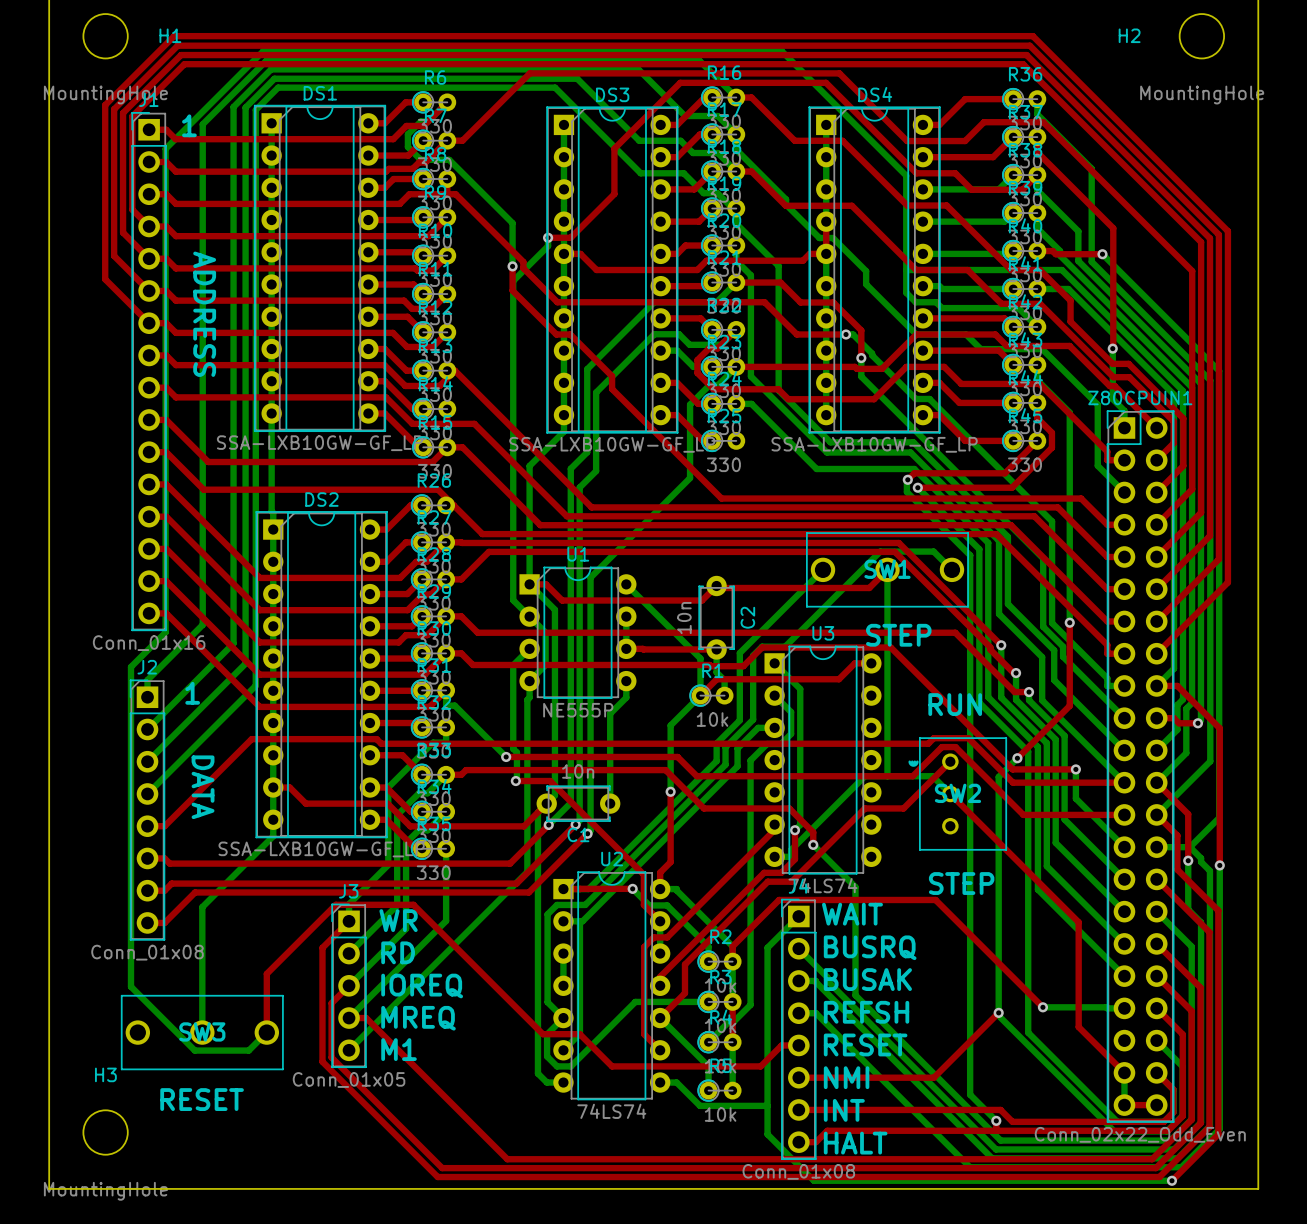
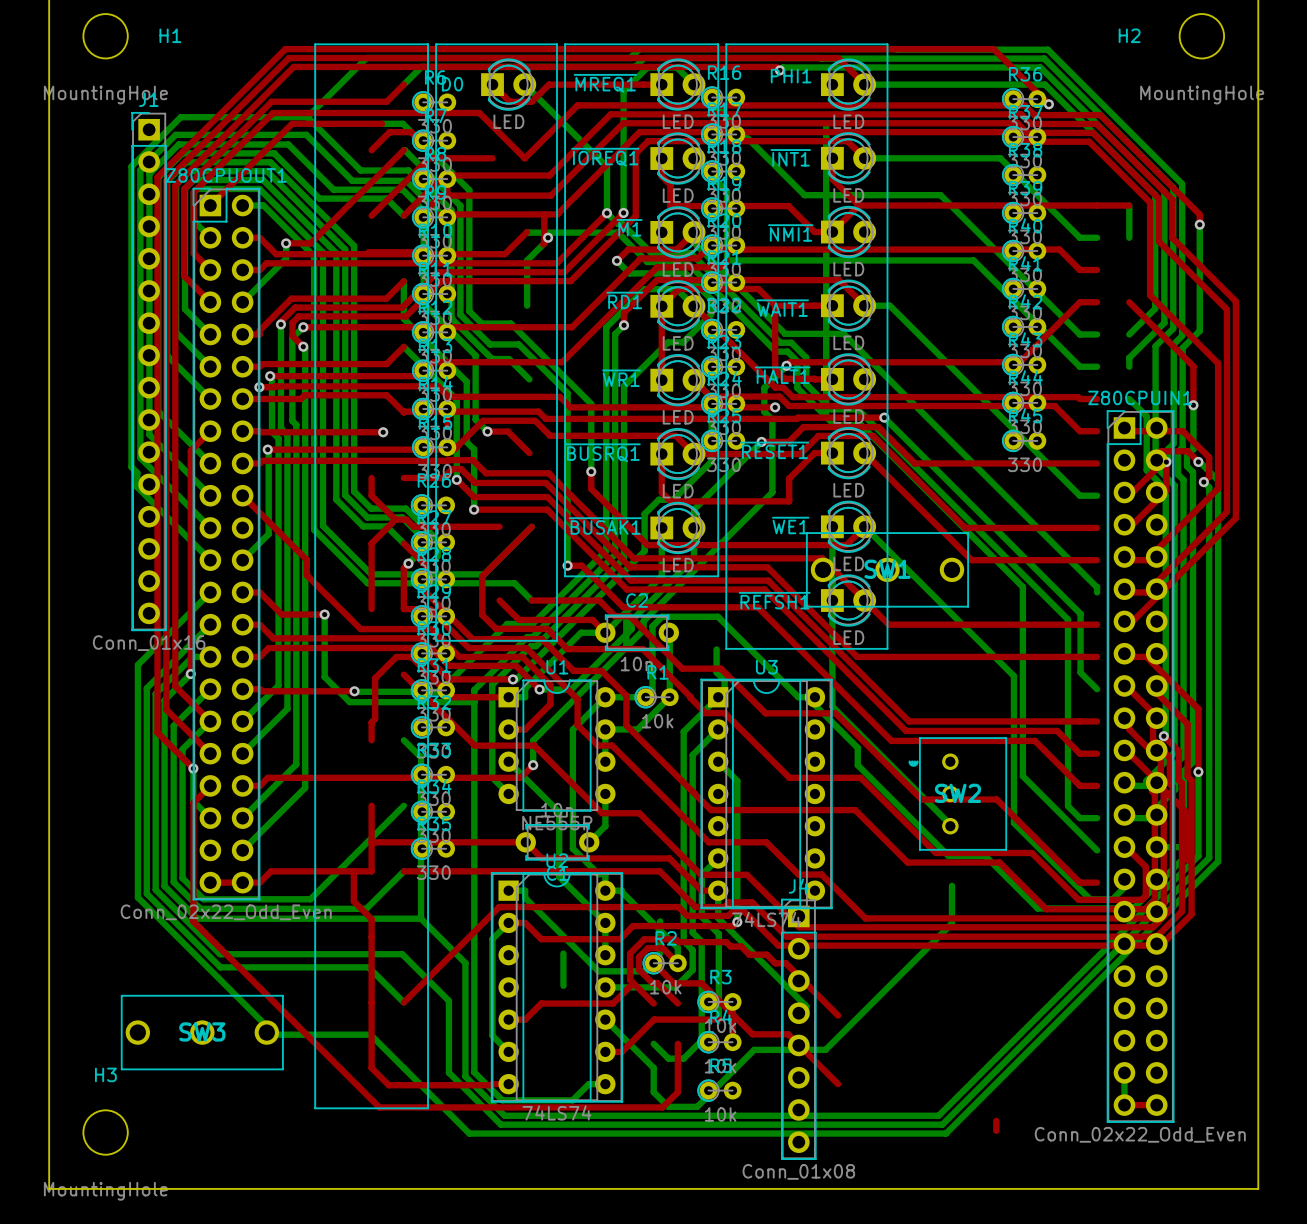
line: none -> (315, 44) (315, 1108) (428, 1108) (428, 44) (315, 44)
line: none -> (436, 44) (557, 44) (557, 640) (436, 640) (436, 44)
line: none -> (565, 44) (718, 44) (718, 576) (565, 576) (565, 44)
line: none -> (726, 44) (887, 44) (887, 648) (726, 648) (726, 44)
top track: none -> (779, 70) (776, 66) (293, 66) (175, 185) (175, 686) (210, 721)
bottom track: none -> (779, 70) (782, 67) (1040, 67) (1164, 191) (1164, 322) (1129, 357) (1129, 366)
via: none -> (779, 70)
top track: none -> (403, 84) (386, 101) (271, 101) (184, 189) (184, 276) (210, 302)
bottom track: none -> (403, 84) (421, 66) (635, 66) (644, 58) (1044, 58) (1173, 187) (1173, 328) (1155, 346) (1155, 466) (1174, 485) (1174, 752) (1146, 780) (1146, 785) (1129, 785)
top track: none -> (492, 84) (509, 101) (531, 101) (548, 84) (661, 84)
D0: none -> LED (508, 84)
bottom track: none -> (524, 84) (606, 166) (606, 213) (617, 223) (622, 223) (651, 253) (690, 253) (780, 342) (791, 342) (806, 357) (806, 384) (831, 409) (857, 409) (1067, 619) (1067, 806) (1079, 818) (1097, 818)
~{MREQ1}: none -> LED (677, 84)
PHI1: none -> LED (848, 84)
top track: none -> (864, 84) (838, 58) (289, 58) (166, 180) (166, 709) (210, 753)
bottom track: none -> (864, 84) (1045, 84) (1155, 194) (1155, 308) (1129, 334)
top track: (712, 97) (704, 97) (677, 124) (660, 124) -> none
top track: (736, 97) (751, 97) (794, 140) (842, 140) (907, 205) -> (858, 205) (907, 205)
bottom track: (736, 97) (699, 60) (266, 60) (202, 124) (202, 624) (147, 680) (147, 697) -> none
top track: (1013, 99) (965, 99) (939, 124) (922, 124) -> none
bottom track: (1037, 99) (1037, 114) (1091, 168) (1091, 261) (1210, 380) (1210, 761) (1156, 814) -> none
top track: (423, 102) (405, 102) (384, 123) (368, 123) -> none
top track: (447, 102) (423, 125) (406, 125) (393, 139) (175, 139) (166, 129) (149, 129) -> none
bottom track: (447, 102) (428, 121) (420, 121) (407, 134) (407, 147) (420, 159) (449, 159) (512, 223) (512, 266) -> none
top track: none -> (1048, 104) (993, 49) (285, 49) (157, 177) (157, 732) (193, 768)
via: none -> (1048, 104)
bottom track: none -> (307, 117) (360, 170) (408, 170) (451, 210) (451, 318) (492, 359) (508, 359) (529, 379)
bottom track: none -> (307, 117) (180, 117) (131, 166) (131, 466) (137, 472) (137, 487) (210, 560)
bottom track: none -> (307, 117) (366, 58) (630, 58) (639, 49) (1047, 49) (1182, 183) (1182, 335) (1173, 344) (1173, 443) (1168, 449) (1168, 460) (1166, 462)
bottom track: (271, 123) (273, 836) (202, 907) (202, 1032) -> none
top track: none -> (382, 123) (292, 123) (210, 205)
bottom track: none -> (382, 123) (402, 123) (469, 190) (469, 311) (481, 323) (510, 323) (591, 403) (591, 471)
bottom track: (563, 124) (563, 431) (529, 466) (529, 584) (554, 609) (554, 795) (537, 812) (537, 1073) (546, 1082) (563, 1082) -> none
text: 1 (189, 125) -> none
top track: (712, 134) (699, 134) (677, 157) (660, 157) -> none
top track: (1013, 137) (993, 157) (922, 157) -> none
top track: (1037, 137) (1037, 152) (1113, 228) (1112, 348) -> none
top track: (423, 140) (408, 155) (368, 155) -> none
top track: none -> (371, 150) (389, 132) (411, 132) (429, 150) (429, 158)
top track: none -> (403, 150) (310, 243) (286, 243)
bottom track: none -> (403, 150) (460, 205) (460, 314) (490, 344) (518, 344) (567, 393) (567, 565)
top track: none -> (429, 158) (371, 215)
top track: none -> (429, 158) (492, 158)
top track: none -> (661, 158) (661, 176) (670, 184) (670, 206) (788, 206) (814, 232) (832, 232) (858, 205)
~{IOREQ1}: none -> LED (677, 158)
bottom track: none -> (694, 158) (727, 191) (727, 260) (973, 260) (1079, 366) (1097, 366)
top track: none -> (832, 158) (832, 179) (858, 205)
~{INT1}: none -> LED (848, 158)
top track: none -> (864, 158) (847, 141) (648, 141) (635, 153) (635, 216) (570, 281) (441, 281) (406, 316) (298, 316) (292, 322) (292, 335) (303, 346)
bottom track: none -> (864, 158) (1000, 158) (1079, 237) (1097, 237)
top track: (149, 162) (166, 162) (175, 171) (386, 171) (388, 168) (412, 168) (419, 162) (425, 162) (447, 140) (462, 140) (529, 73) (839, 73) (907, 141) (965, 141) (983, 122) (1043, 122) (1192, 271) (1192, 489) (1156, 524) -> none
top track: (712, 171) (694, 189) (660, 189) -> none
top track: (736, 171) (751, 171) (785, 205) (851, 205) (916, 270) (967, 270) (1001, 303) (1040, 303) (1113, 377) (1129, 377) (1173, 421) (1173, 443) (1156, 460) -> none
bottom track: (736, 171) (717, 153) (692, 153) (680, 140) (639, 140) (577, 78) (274, 78) (245, 107) (245, 663) (147, 761) -> none
bottom track: (1013, 175) (998, 189) (922, 189) -> none
top track: (1037, 175) (1022, 189) (971, 189) (955, 173) (916, 173) (826, 82) (680, 82) (614, 148) (614, 194) (570, 237) (548, 237) -> none
bottom track: (1037, 175) (1037, 190) (1078, 231) (1078, 261) (1200, 383) (1200, 720) (1197, 723) -> none
top track: (423, 179) (393, 179) (384, 187) (368, 187) -> none
top track: (149, 194) (166, 194) (175, 203) (399, 203) (409, 194) (455, 194) (523, 261) (523, 268) (557, 302) (764, 302) (796, 334) (846, 334) -> none
bottom track: none -> (242, 205) (263, 205) (314, 256) (314, 529) (367, 583) (514, 583) (531, 600)
top track: (946, 205) (1011, 270) (1039, 270) (1070, 300) (1070, 321) (1112, 363) (1128, 363) (1183, 418) (1183, 465) (1156, 492) -> (946, 205) (1129, 205)
bottom track: none -> (1129, 205) (1129, 237)
top track: (712, 208) (699, 221) (660, 221) -> none
bottom track: (736, 208) (736, 223) (778, 266) (778, 390) (830, 442) (913, 442) (1007, 536) (1007, 604) (1054, 650) (1054, 680) (1124, 750) -> none
bottom track: (736, 211) (717, 193) (703, 193) (683, 173) (640, 173) (555, 87) (278, 87) (255, 110) (255, 685) (147, 793) -> none
top track: none -> (423, 212) (440, 195) (551, 195) (623, 123) (1017, 123) (1027, 132) (1092, 132) (1158, 198) (1158, 241) (1226, 309) (1226, 511) (1146, 592) (1129, 592)
top track: none -> (623, 212) (564, 272) (437, 272) (402, 307) (295, 307) (280, 321) (280, 324)
bottom track: none -> (623, 212) (623, 91) (647, 67) (676, 67) (804, 195) (940, 195) (1079, 334) (1097, 334)
via: none -> (623, 212)
top track: none -> (606, 213) (556, 263) (266, 263) (259, 270) (242, 270)
via: none -> (606, 213)
bottom track: (1013, 213) (1004, 221) (922, 221) -> none
bottom track: (1037, 213) (1037, 228) (1060, 251) (1060, 255) (1192, 387) (1192, 702) (1186, 708) (1186, 753) (1156, 782) -> none
top track: none -> (439, 214) (557, 214) (639, 132) (1013, 132) (1023, 141) (1089, 141) (1150, 202) (1150, 295) (1218, 363) (1218, 488) (1146, 560) (1129, 560)
bottom track: none -> (439, 214) (439, 212) (406, 180) (352, 180) (306, 134) (175, 134) (140, 170) (140, 457) (210, 527)
top track: none -> (544, 214) (543, 244)
top track: none -> (403, 215) (444, 175) (549, 175) (610, 114) (1021, 114) (1030, 123) (1096, 123) (1172, 199) (1172, 237) (1235, 301) (1235, 518) (1129, 624)
bottom track: none -> (403, 215) (386, 198) (319, 198) (274, 153) (182, 153) (158, 177) (158, 411) (210, 463)
top track: (423, 217) (420, 220) (368, 220) -> none
top track: (447, 217) (428, 236) (175, 236) (166, 226) (149, 226) (132, 209) (132, 116) (184, 64) (1023, 64) (1201, 242) (1201, 512) (1156, 556) -> none
top track: (826, 221) (826, 253) (809, 253) (802, 260) (706, 260) (697, 270) (596, 270) (580, 253) (563, 253) -> none
top track: none -> (1199, 224) (1199, 214) (1100, 115) (1034, 115) (1024, 105) (577, 105) (524, 158) (479, 113) (272, 113) (193, 192) (193, 253) (210, 270)
bottom track: none -> (1199, 224) (1199, 330) (1182, 347) (1182, 447) (1178, 451) (1178, 474) (1183, 480) (1183, 756) (1175, 764) (1175, 789) (1146, 818) (1129, 818)
via: none -> (1199, 224)
top track: none -> (527, 232) (504, 254) (276, 254) (259, 237) (242, 237)
bottom track: none -> (527, 232) (617, 232) (647, 262) (686, 262) (776, 351) (787, 351) (797, 361) (797, 387) (834, 425) (861, 425) (1022, 586) (1022, 776) (1097, 850)
~{M1}: none -> LED (677, 232)
top track: none -> (694, 232) (676, 249) (628, 249) (616, 260)
bottom track: none -> (694, 232) (694, 242) (785, 333) (843, 333) (1097, 587) (1097, 592)
~{NMI1}: none -> LED (848, 232)
bottom track: none -> (210, 237) (193, 221) (193, 192) (197, 188) (259, 188) (322, 252) (322, 526) (371, 574) (484, 574) (531, 526)
bottom track: (548, 237) (548, 246) (513, 281) (513, 600) (545, 632) (545, 665) (529, 681) (529, 697) (527, 699) (527, 871) (349, 1050) -> none
bottom track: none -> (286, 243) (286, 258) (242, 302)
via: none -> (286, 243)
bottom track: none -> (543, 244) (527, 260) (527, 305)
top track: (712, 245) (685, 245) (677, 253) (660, 253) -> none
bottom track: (736, 245) (736, 260) (750, 275) (750, 376) (827, 452) (910, 452) (999, 540) (999, 614) (1042, 657) (1042, 700) (1124, 782) -> none
bottom track: (1013, 251) (1010, 253) (922, 253) -> none
top track: (1037, 251) (1052, 251) (1055, 254) (1102, 254) -> none
bottom track: (1102, 254) (1219, 370) (1219, 817) (1189, 847) (1209, 870) (1209, 1126) (1177, 1158) (992, 1158) (815, 980) (798, 980) -> none
via: (1102, 254) -> none
top track: (447, 255) (432, 270) (417, 270) (415, 268) (175, 268) (166, 258) (149, 258) (123, 232) (123, 113) (181, 55) (1026, 55) (1210, 238) (1210, 535) (1156, 589) -> none
bottom track: none -> (616, 260) (629, 273) (685, 273) (711, 299) (711, 314) (683, 342) (668, 342) (624, 386) (624, 558) (536, 646) (530, 646) (492, 684) (492, 777) (508, 793)
via: none -> (616, 260)
top track: none -> (727, 260) (720, 267) (657, 267) (562, 362) (433, 362) (419, 376) (270, 376)
top track: (512, 266) (512, 290) (556, 334) (570, 334) (612, 376) (612, 389) (721, 498) (1081, 498) (1107, 524) (1124, 524) -> none
via: (512, 266) -> none
DS1: SSA-LXB10GW-GF_LP (320, 268) -> none
DS3: SSA-LXB10GW-GF_LP (612, 270) -> none
DS4: SSA-LXB10GW-GF_LP (874, 270) -> none
bottom track: (906, 270) (1061, 270) (1183, 391) (1183, 699) (1177, 705) (1177, 729) (1156, 750) -> none
top track: none -> (1097, 270) (1079, 270) (1059, 249) (706, 249) (697, 258) (640, 258) (572, 327) (303, 327)
top track: none -> (403, 281) (386, 298) (291, 298) (259, 330) (259, 334) (242, 334)
bottom track: none -> (403, 281) (403, 318) (466, 381) (466, 442) (474, 449) (474, 509)
top track: (712, 282) (708, 286) (660, 286) -> none
top track: (736, 282) (780, 282) (800, 302) (833, 302) (861, 330) (861, 358) -> none
bottom track: (736, 282) (716, 302) (654, 302) (587, 369) (587, 452) (570, 468) (570, 802) (548, 824) -> none
top track: (368, 284) (413, 284) (423, 294) -> none
bottom track: (922, 286) (939, 286) (942, 289) (1013, 289) -> none
bottom track: (1037, 289) (1068, 289) (1174, 394) (1174, 668) (1156, 685) -> none
top track: (447, 294) (432, 308) (412, 308) (404, 300) (175, 300) (166, 290) (149, 290) (114, 255) (114, 109) (177, 45) (1029, 45) (1218, 234) (1218, 559) (1156, 621) -> none
top track: none -> (1097, 302) (1079, 302) (1019, 362) (790, 362) (786, 365)
top track: none -> (1129, 302) (1193, 366) (1193, 405)
top track: none -> (775, 305) (775, 369) (784, 378) (832, 379)
top track: none -> (775, 305) (832, 305)
top track: none -> (775, 305) (758, 289) (679, 289) (661, 306) (661, 380)
~{WAIT1}: none -> LED (848, 305)
top track: none -> (864, 305) (839, 280) (656, 280) (624, 313) (624, 325)
bottom track: none -> (864, 305) (889, 305) (1079, 495) (1097, 495)
~{RD1}: none -> LED (677, 306)
top track: none -> (694, 306) (775, 387) (783, 387) (792, 397) (1078, 397) (1079, 398) (1097, 398)
bottom track: none -> (694, 306) (676, 289) (644, 289) (606, 327) (606, 550) (532, 623) (507, 623) (439, 691) (354, 691)
text: ADDRESS (204, 314) -> none
top track: (368, 316) (407, 316) (423, 332) -> none
top track: (660, 318) (700, 318) (712, 329) -> none
top track: (922, 318) (1004, 318) (1013, 326) -> none
bottom track: none -> (280, 324) (280, 428) (287, 434) (287, 708) (242, 753)
via: none -> (280, 324)
bottom track: none -> (624, 325) (615, 334) (615, 554) (532, 637) (527, 637) (474, 690) (474, 1072) (502, 1100) (572, 1100) (588, 1084) (605, 1084)
via: none -> (624, 325)
bottom track: (1037, 326) (1018, 308) (941, 308) (936, 302) (915, 302) (906, 292) (906, 175) (781, 51) (263, 51) (165, 148) (165, 632) (131, 666) (131, 986) (194, 1050) (248, 1050) (266, 1032) -> none
bottom track: none -> (303, 327) (292, 338) (292, 420) (296, 424) (296, 764) (242, 818)
via: none -> (303, 327)
top track: (736, 329) (717, 348) (709, 348) (697, 360) (697, 373) (713, 389) (778, 389) (788, 399) (874, 399) (906, 366) (944, 366) (961, 383) (1039, 383) (1107, 451) (1107, 460) (1124, 460) -> none
bottom track: (736, 329) (721, 344) (689, 344) (679, 334) (654, 334) (596, 392) (596, 471) (579, 487) (579, 820) (575, 824) -> none
top track: (447, 332) (432, 346) (407, 346) (392, 332) (175, 332) (166, 323) (149, 323) (105, 279) (105, 105) (174, 36) (1032, 36) (1227, 231) (1227, 582) (1156, 653) -> none
bottom track: none -> (210, 334) (184, 309) (184, 188) (193, 180) (263, 180) (336, 253) (336, 499) (363, 526) (386, 526) (403, 543)
bottom track: (846, 334) (853, 334) (915, 398) (929, 398) (1052, 521) (1052, 623) (1107, 678) (1107, 685) (1124, 685) -> none
via: (846, 334) -> none
bottom track: none -> (303, 346) (305, 348) (305, 787) (242, 850)
via: none -> (303, 346)
top track: none -> (403, 346) (386, 364) (262, 364) (259, 366) (242, 366)
bottom track: none -> (403, 346) (456, 399) (456, 479)
bottom track: (1112, 348) (1112, 399) (1124, 410) (1124, 428) -> none
via: (1112, 348) -> none
top track: (368, 349) (384, 349) (406, 370) (423, 370) -> none
bottom track: (660, 350) (677, 350) (693, 366) (712, 366) -> none
top track: (922, 350) (998, 350) (1013, 364) -> none
top track: (149, 355) (166, 355) (175, 365) (384, 365) (405, 385) (439, 385) (454, 370) -> none
bottom track: (861, 358) (861, 376) (1043, 558) (1043, 626) (1063, 646) (1063, 656) (1124, 718) -> none
via: (861, 358) -> none
bottom track: (1037, 364) (1037, 380) (1069, 412) (1069, 622) -> none
bottom track: none -> (786, 365) (764, 387) (764, 411) (772, 419) (772, 492) (643, 621) (643, 630) (533, 740) (533, 765)
via: none -> (786, 365)
bottom track: none -> (210, 366) (176, 332) (176, 184) (189, 171) (266, 171) (345, 249) (345, 495) (367, 517) (402, 517) (421, 536) (421, 550) (408, 563)
top track: (736, 366) (854, 366) (856, 368) (881, 368) (916, 334) (995, 334) (1006, 345) (1069, 345) (1109, 386) (1114, 386) (1156, 428) -> none
bottom track: (736, 366) (717, 385) (709, 385) (690, 404) (690, 478) (590, 577) (590, 830) (587, 833) -> none
top track: (454, 370) (591, 507) (1057, 507) (1107, 556) (1124, 556) -> none
bottom track: none -> (270, 376) (272, 378) (272, 431) (278, 438) (278, 685) (242, 721)
via: none -> (270, 376)
~{HALT1}: none -> LED (848, 379)
~{WR1}: none -> LED (677, 380)
top track: none -> (694, 380) (710, 396) (779, 396) (789, 406) (1054, 406) (1079, 431) (1097, 431)
bottom track: none -> (694, 380) (711, 397) (711, 461) (673, 499) (658, 499) (644, 513) (644, 551) (516, 679) (512, 679)
top track: (368, 381) (384, 381) (412, 409) (423, 409) -> none
top track: (660, 382) (677, 382) (698, 403) (712, 403) -> none
top track: (922, 382) (939, 382) (959, 402) (1013, 402) -> none
top track: (149, 387) (166, 387) (175, 397) (386, 397) (412, 423) (474, 423) (566, 516) (1034, 516) (1107, 589) (1124, 589) -> none
top track: none -> (259, 387) (437, 386) (448, 396) (559, 396) (570, 407) (775, 407)
via: none -> (259, 387)
bottom track: none -> (210, 398) (167, 355) (167, 181) (186, 162) (270, 162) (354, 245) (354, 491) (371, 508) (405, 508) (437, 540) (437, 556)
top track: none -> (242, 398) (300, 398) (304, 395) (386, 395) (403, 412) (538, 411) (545, 418) (884, 417)
bottom track: none -> (1129, 398) (1146, 416) (1146, 470) (1165, 489) (1165, 734) (1163, 736)
top track: (1037, 402) (1037, 418) (1051, 432) (1051, 447) (1011, 487) (917, 487) -> none
bottom track: (736, 403) (751, 403) (816, 468) (914, 468) (988, 542) (988, 697) (1037, 746) (1037, 889) (1124, 976) -> none
bottom track: none -> (1193, 405) (1193, 449) (1186, 455) (1186, 466) (1193, 472) (1193, 762) (1184, 770) (1184, 857) (1133, 908) (1037, 908) (985, 856) (948, 856) (857, 765) (857, 747) (814, 705) (814, 697) (798, 697) (717, 616) (662, 616) (652, 626) (652, 690) (645, 697) (605, 697) (572, 729) (572, 848) (598, 874) (605, 874) (605, 890) (621, 890) (677, 948) (677, 963)
via: none -> (1193, 405)
via: none -> (775, 407)
top track: (368, 413) (384, 413) (418, 447) (423, 447) -> none
top track: (660, 415) (677, 415) (703, 440) (712, 440) -> none
top track: (922, 415) (939, 415) (965, 440) (1013, 440) -> none
bottom track: none -> (884, 417) (1080, 613) (1080, 672) (1097, 689)
via: none -> (884, 417)
top track: (149, 419) (166, 419) (208, 462) (432, 462) (447, 447) (462, 447) (540, 525) (1011, 525) (1107, 621) (1124, 621) -> none
top track: none -> (210, 431) (190, 450) (190, 674)
top track: none -> (242, 431) (383, 432)
top track: none -> (487, 431) (507, 431) (529, 453)
bottom track: none -> (487, 431) (475, 419) (475, 355) (423, 303) (423, 210) (402, 189) (333, 189) (288, 144) (178, 144) (149, 173) (149, 434) (210, 495)
via: none -> (487, 431)
top track: none -> (1129, 431) (1182, 431) (1209, 457) (1209, 476) (1203, 482)
via: none -> (383, 432)
top track: (1037, 440) (1004, 473) (914, 473) (907, 479) -> none
top track: none -> (761, 441) (788, 441) (803, 427) (878, 427) (914, 463) (1097, 463)
bottom track: none -> (761, 441) (694, 509) (694, 558) (631, 620) (631, 629) (571, 689) (539, 689)
via: none -> (761, 441)
top track: none -> (267, 449) (454, 449) (483, 420) (535, 420) (550, 435) (675, 435) (694, 454) (800, 454) (818, 435) (873, 435) (965, 527) (1097, 527)
bottom track: none -> (267, 449) (268, 534) (242, 560)
via: none -> (267, 449)
top track: (149, 452) (166, 452) (203, 489) (438, 489) (482, 534) (996, 534) (1107, 645) (1107, 653) (1124, 653) -> none
top track: none -> (832, 453) (814, 453) (789, 478) (789, 501) (670, 501) (661, 492) (661, 454)
~{RESET1}: none -> LED (848, 453)
top track: none -> (864, 453) (971, 560) (1097, 560)
~{BUSRQ1}: none -> LED (677, 454)
top track: none -> (1198, 461) (1187, 451) (1160, 451) (1155, 456) (1155, 469) (1129, 495)
bottom track: none -> (1198, 461) (1218, 480) (1218, 861) (946, 1133) (469, 1133) (370, 1034) (275, 1034) (137, 897) (137, 664) (210, 592)
via: none -> (1198, 461)
top track: none -> (1166, 462) (1166, 490) (1129, 527)
via: none -> (1166, 462)
top track: none -> (242, 463) (259, 463) (262, 460) (472, 460) (486, 473) (548, 473) (633, 558) (822, 558) (888, 624) (1097, 624)
top track: none -> (591, 471) (591, 488) (647, 545) (846, 545) (864, 526)
via: none -> (591, 471)
top track: none -> (371, 477) (371, 495) (395, 519)
top track: none -> (403, 477) (443, 477) (452, 469) (461, 469) (475, 482) (545, 482) (630, 567) (767, 567) (857, 656) (1097, 656)
top track: none -> (456, 479) (474, 497) (547, 497) (630, 580) (768, 580) (909, 721) (1097, 721)
via: none -> (456, 479)
bottom track: (907, 479) (906, 492) (970, 555) (970, 1094) (996, 1120) -> none
via: (907, 479) -> none
bottom track: none -> (1203, 482) (1209, 487) (1209, 857) (942, 1124) (500, 1124) (448, 1072) (448, 1000) (402, 954) (220, 954) (155, 889) (155, 693) (192, 656) (210, 656)
via: none -> (1203, 482)
top track: (149, 484) (166, 484) (259, 577) (400, 577) (416, 561) (426, 561) (446, 542) (898, 542) (1001, 645) -> none
bottom track: (917, 487) (979, 549) (979, 702) (1028, 751) (1028, 1032) (1117, 1121) (1163, 1121) (1173, 1112) (1173, 1089) (1156, 1072) -> none
via: (917, 487) -> none
bottom track: (1124, 492) (1097, 465) (1097, 404) (1042, 349) (980, 349) (966, 334) (916, 334) (866, 284) (866, 271) (832, 238) (819, 238) (786, 204) (786, 199) (736, 149) (736, 134) (717, 116) (685, 116) (638, 69) (271, 69) (233, 107) (233, 643) (147, 729) -> none
top track: none -> (242, 495) (306, 559) (306, 575) (360, 629) (431, 629) (459, 656) (522, 656) (550, 685) (550, 704) (525, 729) (508, 729)
top track: (422, 505) (410, 505) (386, 529) (369, 529) -> none
top track: none -> (474, 509) (547, 509) (627, 589) (764, 589) (906, 730) (1057, 730) (1079, 753) (1097, 753)
via: none -> (474, 509)
top track: (149, 516) (166, 516) (259, 610) (407, 610) (423, 594) (431, 594) (446, 579) (461, 579) (488, 551) (894, 551) (1013, 673) (1016, 673) -> none
top track: none -> (395, 519) (406, 519) (413, 526) (499, 526)
top track: none -> (395, 519) (371, 543) (371, 609)
top track: none -> (531, 526) (482, 576) (482, 615) (496, 628) (547, 628) (567, 649) (642, 649) (705, 713) (724, 713) (789, 777) (860, 777) (935, 852) (1031, 852) (1078, 899) (1141, 899) (1145, 895) (1145, 866) (1129, 850)
bottom track: none -> (832, 526) (832, 706) (951, 826)
~{WE1}: none -> LED (848, 526)
bottom track: none -> (864, 526) (1013, 676) (1013, 823) (1090, 899) (1112, 899) (1129, 882)
bottom track: none -> (661, 527) (661, 576) (605, 632) (580, 632) (525, 688) (525, 697) (508, 697)
~{BUSAK1}: none -> LED (677, 527)
top track: (422, 542) (405, 542) (386, 561) (369, 561) -> none
top track: none -> (403, 543) (426, 566) (426, 593) (472, 639) (541, 639) (573, 670) (601, 670) (626, 695) (626, 725) (711, 810) (855, 810) (907, 862) (999, 862) (1046, 909) (1145, 909) (1154, 899) (1154, 793) (1152, 791) (1152, 776) (1129, 753)
Z80CPUOUT1: none -> Conn_02x22_Odd_Even (226, 544)
top track: (149, 548) (166, 548) (259, 642) (398, 642) (406, 635) (427, 635) (446, 616) (461, 616) (477, 632) (955, 632) (1014, 692) (1029, 692) -> none
top track: none -> (408, 563) (403, 568) (403, 609) (429, 609) (468, 648) (526, 648) (577, 699) (577, 725) (597, 745) (612, 745) (708, 842) (766, 842) (798, 874) (821, 874) (865, 918) (1149, 918) (1163, 904) (1163, 790) (1160, 787) (1160, 761) (1129, 729) (1129, 721)
via: none -> (408, 563)
top track: none -> (567, 565) (581, 565) (623, 607) (757, 607) (891, 740) (1034, 740) (1079, 785) (1097, 785)
via: none -> (567, 565)
bottom track: (823, 569) (739, 653) (739, 720) (716, 743) (716, 761) (588, 889) (563, 889) -> none
top track: (887, 569) (869, 587) (718, 587) (716, 585) (702, 600) (599, 600) -> (1097, 882) (1079, 882) (996, 799) (921, 799) (835, 713) (765, 713) (720, 668) (682, 668) (629, 616) (614, 616) (599, 600)
bottom track: (887, 569) (887, 776) -> none
bottom track: (951, 569) (933, 551) (880, 551) (785, 646) (762, 646) (753, 655) (753, 719) (725, 747) (725, 764) (585, 904) (557, 904) (547, 914) (547, 1002) (563, 1018) (547, 1034) (547, 1056) (557, 1066) (570, 1066) (635, 1001) (708, 1001) -> none
top track: (422, 579) (407, 594) (369, 594) -> none
top track: (149, 581) (166, 581) (259, 674) (424, 674) (446, 653) (461, 653) (472, 664) (743, 666) (762, 647) (890, 647) (1012, 769) (1075, 769) -> none
top track: (529, 584) (546, 584) (562, 600) -> (531, 600) (562, 600)
bottom track: (626, 584) (700, 658) (700, 695) (670, 725) (670, 791) -> none
top track: none -> (242, 592) (259, 592) (281, 614) (324, 614)
top track: none -> (499, 600) (519, 619) (592, 619) (605, 632)
~{REFSH1}: none -> LED (848, 600)
top track: (149, 613) (166, 613) (259, 706) (429, 706) (446, 690) -> none
bottom track: none -> (324, 614) (324, 677) (349, 702) (474, 702)
via: none -> (324, 614)
top track: (422, 616) (412, 626) (369, 626) -> none
C2 rotation: 0° (716, 617) -> 90° clockwise (637, 632)
C2 position: (716, 617) -> (637, 632)
C2 name position: C2 (747, 617) -> C2 (637, 600)
C2 value position: 10n (684, 618) -> 10n (636, 664)
top track: (1069, 622) (1069, 705) (1017, 758) -> none
via: (1069, 622) -> none
bottom track: none -> (210, 624) (146, 688) (146, 893) (220, 967) (368, 967) (403, 1002)
top track: none -> (242, 624) (259, 624) (273, 638) (421, 638) (448, 665) (515, 665) (539, 689)
U1 position: (577, 632) -> (557, 745)
bottom track: none -> (668, 632) (669, 697) (637, 729) (605, 729) (605, 761)
text: STEP (898, 635) -> none
U3 footprint: [764, 645, 882, 875] -> [700, 678, 833, 910]
bottom track: (1001, 645) (1001, 697) (1046, 743) (1046, 866) (1124, 943) -> none
via: (1001, 645) -> none
bottom track: (529, 648) (513, 665) (513, 748) (516, 752) (515, 781) -> none
top track: (626, 648) (716, 649) -> none
top track: (422, 653) (416, 658) (369, 658) -> none
top track: none -> (242, 656) (259, 656) (268, 648) (418, 648) (449, 679) (512, 679)
top track: none -> (1129, 656) (1146, 656) (1198, 708) (1198, 771)
bottom track: (774, 663) (800, 688) (800, 824) (794, 830) -> none
top track: (871, 663) (854, 663) (838, 679) (716, 679) (700, 695) -> none
bottom track: (1016, 673) (1016, 699) (1055, 739) (1055, 842) (1124, 911) -> none
via: (1016, 673) -> none
bottom track: none -> (190, 674) (164, 700) (164, 886) (197, 918) (421, 918)
via: none -> (190, 674)
DS2: SSA-LXB10GW-GF_LP (321, 674) -> none
top track: none -> (403, 674) (474, 745) (534, 745) (601, 813) (639, 813) (700, 874) (746, 874) (799, 927) (1153, 927) (1172, 907) (1172, 786) (1169, 783) (1169, 757) (1153, 740) (1153, 712) (1129, 689)
via: none -> (512, 679)
bottom track: (626, 681) (626, 697) (610, 713) (610, 803) -> none
top track: (1156, 685) (1177, 685) (1219, 728) (1219, 865) -> none
bottom track: none -> (210, 689) (173, 725) (173, 882) (200, 908) (366, 908) (403, 871)
top track: none -> (242, 689) (259, 689) (261, 691) (354, 691)
via: none -> (539, 689)
top track: (422, 690) (369, 690) -> none
bottom track: (446, 690) (446, 705) (454, 705) (506, 756) -> none
via: none -> (354, 691)
top track: none -> (1154, 691) (1187, 724) (1187, 776) (1191, 780) (1191, 914) (1160, 945) (778, 945) (744, 911) (732, 911) (728, 915) (687, 915) (678, 907) (499, 907) (403, 1002)
bottom track: (1029, 692) (1029, 700) (1064, 735) (1064, 819) (1124, 879) -> none
via: (1029, 692) -> none
text: 1 (192, 693) -> none
R1 position: (711, 695) -> (656, 697)
bottom track: (774, 695) (791, 712) (791, 733) (781, 743) (767, 743) (750, 760) (750, 1004) (733, 1022) (728, 1022) (708, 1042) -> none
top track: none -> (508, 697) (451, 697) (411, 656) (396, 656) (375, 678) (375, 718) (371, 722) (371, 740)
bottom track: none -> (718, 697) (683, 731) (683, 941) (692, 950) (692, 970) (675, 987) (605, 987)
text: RUN (955, 704) -> none
top track: (1156, 718) (1173, 718) (1178, 723) (1197, 723) -> none
bottom track: none -> (210, 721) (182, 749) (182, 878) (203, 899) (310, 899) (403, 805)
top track: (369, 723) (417, 723) (422, 727) -> none
via: (1197, 723) -> none
bottom track: (446, 727) (446, 742) (433, 742) (388, 787) (388, 864) (349, 904) (349, 921) -> none
bottom track: (774, 727) (758, 727) (737, 748) (737, 766) (582, 921) (563, 921) -> none
bottom track: none -> (718, 729) (692, 755) (692, 932) (701, 941) (701, 1040) (683, 1058) (668, 1058) (653, 1043)
top track: none -> (1163, 736) (1178, 751) (1178, 780) (1182, 783) (1182, 911) (1156, 936) (786, 936) (752, 902) (729, 902) (724, 907) (695, 907) (659, 871) (403, 871)
via: none -> (1163, 736)
bottom track: none -> (403, 740) (421, 757) (421, 918)
top track: (369, 755) (402, 755) (422, 774) -> none
top track: (506, 756) (677, 756) (696, 776) (912, 776) (941, 747) (955, 747) (1023, 814) (1124, 814) -> none
via: (506, 756) -> none
bottom track: (1017, 758) (998, 776) (998, 1015) (1114, 1131) (1166, 1131) (1182, 1115) (1182, 1066) (1156, 1040) -> none
via: (1017, 758) -> none
bottom track: none -> (508, 761) (559, 812) (559, 876) (605, 922) (605, 955)
bottom track: none -> (718, 761) (737, 780) (737, 922)
top track: (950, 761) (903, 808) (864, 808) (791, 881) (767, 881) (684, 964) (684, 993) (660, 1018) -> none
top track: none -> (533, 765) (520, 777) (267, 777) (259, 785) (242, 785)
via: none -> (533, 765)
bottom track: none -> (193, 768) (193, 801) (210, 818)
via: none -> (193, 768)
bottom track: (1075, 769) (1075, 798) (1124, 847) -> none
via: (1075, 769) -> none
bottom track: none -> (1198, 771) (1198, 856) (938, 1115) (504, 1115) (465, 1076) (465, 963) (421, 918)
via: none -> (1198, 771)
top track: (446, 774) (461, 774) (466, 770) (665, 770) (703, 808) (789, 808) (813, 832) (813, 844) -> none
bottom track: (446, 774) (427, 793) (419, 793) (397, 815) (397, 905) (349, 953) -> none
top track: (515, 781) (550, 781) (643, 874) (643, 905) (660, 921) -> none
via: (515, 781) -> none
top track: (1124, 782) (1013, 782) (968, 738) (933, 738) (928, 743) (381, 743) (376, 739) (251, 739) (164, 826) (147, 826) -> none
top track: none -> (210, 785) (193, 802) (193, 921) (379, 1107) (662, 1107) (677, 1092) (677, 1043)
text: DATA (203, 787) -> none
top track: (273, 787) (289, 787) (305, 803) (387, 803) (410, 826) (523, 826) (546, 803) -> none
top track: (369, 787) (386, 787) (410, 811) (422, 811) -> none
top track: (670, 791) (670, 862) (660, 872) (660, 889) -> none
via: (670, 791) -> none
bottom track: none -> (605, 793) (605, 826) (589, 842)
top track: (950, 793) (1078, 922) (1078, 1027) (1124, 1072) -> none
bottom track: (950, 793) (932, 776) (864, 776) (791, 850) (791, 856) (774, 856) -> none
C1 position: (578, 803) -> (557, 842)
top track: none -> (371, 805) (371, 871) (271, 871) (259, 882) (210, 882)
J2: Conn_01x08 (147, 810) -> none
bottom track: (446, 811) (427, 830) (418, 830) (406, 843) (406, 928) (349, 985) -> none
top track: (1156, 814) (1177, 835) (1177, 869) (1218, 910) (1218, 1134) (1171, 1180) -> none
top track: (369, 819) (386, 819) (415, 848) (422, 848) -> none
top track: (548, 824) (510, 863) (169, 863) (164, 858) (147, 858) -> none
via: (548, 824) -> none
top track: (575, 824) (516, 883) (171, 883) (164, 890) (147, 890) -> none
via: (575, 824) -> none
top track: (774, 824) (774, 829) (667, 937) (653, 937) (644, 947) (644, 1034) (660, 1050) -> none
top track: (794, 830) (794, 859) (781, 872) (764, 872) (660, 976) (660, 985) -> none
via: (794, 830) -> none
top track: (587, 833) (528, 892) (195, 892) (164, 922) (147, 922) -> none
via: (587, 833) -> none
top track: none -> (371, 842) (525, 842) (541, 858) (669, 858) (701, 890) (718, 890)
bottom track: (813, 844) (855, 887) (855, 995) (1000, 1140) (1170, 1140) (1191, 1119) (1191, 946) (1156, 911) -> none
via: (813, 844) -> none
bottom track: (446, 848) (446, 920) (349, 1018) -> none
bottom track: none -> (718, 858) (701, 874) (701, 917) (718, 933) (718, 1019)
bottom track: (1188, 860) (1188, 909) (1201, 922) (1201, 1122) (1174, 1149) (996, 1149) (827, 980) (827, 977) (798, 948) -> none
via: (1188, 860) -> none
bottom track: (1219, 865) (1219, 1128) (1181, 1167) (969, 1167) (815, 1013) (798, 1013) -> none
via: (1219, 865) -> none
top track: none -> (353, 871) (353, 901) (371, 919) (371, 1068) (388, 1085) (508, 1084)
U2 footprint: [553, 871, 671, 1101] -> [490, 872, 624, 1103]
top track: (1156, 879) (1209, 932) (1209, 1127) (1159, 1177) (437, 1177) (322, 1061) (322, 947) (349, 921) -> none
text: STEP (961, 883) -> none
bottom track: none -> (951, 885) (951, 923) (825, 1049) (754, 1049) (697, 1106) (668, 1106) (653, 1092) (653, 1068) (605, 1019)
top track: (632, 888) (563, 889) -> none
bottom track: (632, 888) (649, 905) (667, 905) (708, 946) (708, 961) -> none
via: (632, 888) -> none
bottom track: (660, 889) (676, 889) (732, 946) (732, 1001) -> none
bottom track: none -> (508, 890) (525, 890) (525, 897) (598, 971) (645, 971) (653, 963)
bottom track: none -> (718, 890) (718, 918) (806, 1006) (806, 1015)
text: WAIT (852, 914) -> none
bottom track: (798, 916) (767, 947) (767, 1134) (813, 1180) (1171, 1180) -> none
text: WR (398, 920) -> none
bottom track: (579, 921) (579, 1033) (563, 1050) -> none
bottom track: none -> (508, 922) (492, 939) (492, 1035) (508, 1051)
top track: none -> (737, 922) (733, 926) (633, 926) (619, 939) (541, 939) (525, 922) (508, 922)
via: none -> (737, 922)
top track: (1156, 943) (1200, 987) (1200, 1123) (1155, 1168) (442, 1168) (331, 1057) (331, 1003) (349, 985) -> none
text: BUSRQ (870, 947) -> none
text: RD (398, 952) -> none
R2 position: (719, 961) -> (664, 963)
top track: (732, 961) (732, 946) (779, 899) (935, 899) (1042, 1007) -> none
top track: none -> (653, 963) (673, 983) (701, 983) (752, 1034) (788, 1034) (838, 1084)
top track: none -> (677, 963) (662, 948) (647, 948) (638, 957) (638, 969) (652, 982) (657, 982) (677, 1003)
top track: (1156, 976) (1191, 1011) (1191, 1119) (1152, 1159) (507, 1159) (366, 1018) (349, 1018) -> none
text: BUSAK (867, 979) -> none
top track: none -> (633, 983) (630, 979) (630, 953) (644, 939) (675, 939) (678, 942) (726, 942) (730, 946) (741, 946) (749, 954) (766, 954) (775, 963) (785, 963) (838, 1015)
top track: none -> (633, 983) (653, 1003)
top track: none -> (633, 983) (613, 1003) (541, 1003) (525, 1019) (508, 1019)
J3: Conn_01x05 (349, 985) -> none
text: IOREQ (422, 986) -> none
bottom track: (1042, 1007) (1124, 1008) -> none
via: (1042, 1007) -> none
top track: (1156, 1008) (1182, 1034) (1182, 1116) (1168, 1130) (827, 1130) (815, 1142) (798, 1142) -> none
text: REFSH (866, 1012) -> none
top track: (998, 1012) (933, 1077) (798, 1077) -> none
via: (998, 1012) -> none
text: MREQ (418, 1018) -> none
bottom track: (660, 1018) (708, 1066) (708, 1090) -> none
top track: none -> (718, 1019) (654, 1019) (621, 1051) (605, 1051)
top track: (266, 1032) (266, 973) (335, 904) (413, 904) (542, 1034) (579, 1034) (612, 1066) (760, 1066) (781, 1045) (798, 1045) -> none
bottom track: (732, 1042) (732, 1090) -> none
text: RESET (865, 1044) -> none
text: M1 (399, 1049) -> none
top track: (1156, 1072) (1173, 1089) (1173, 1112) (1163, 1121) (1012, 1121) (1000, 1109) (798, 1109) -> none
text: NMI (846, 1077) -> none
bottom track: (660, 1082) (676, 1082) (700, 1105) (767, 1105) -> none
text: RESET (202, 1099) -> none
text: INT (844, 1110) -> none
via: (996, 1120) -> none
text: HALT (855, 1143) -> none
via: (1171, 1180) -> none

